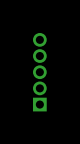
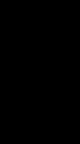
part: (39, 72) -> none

